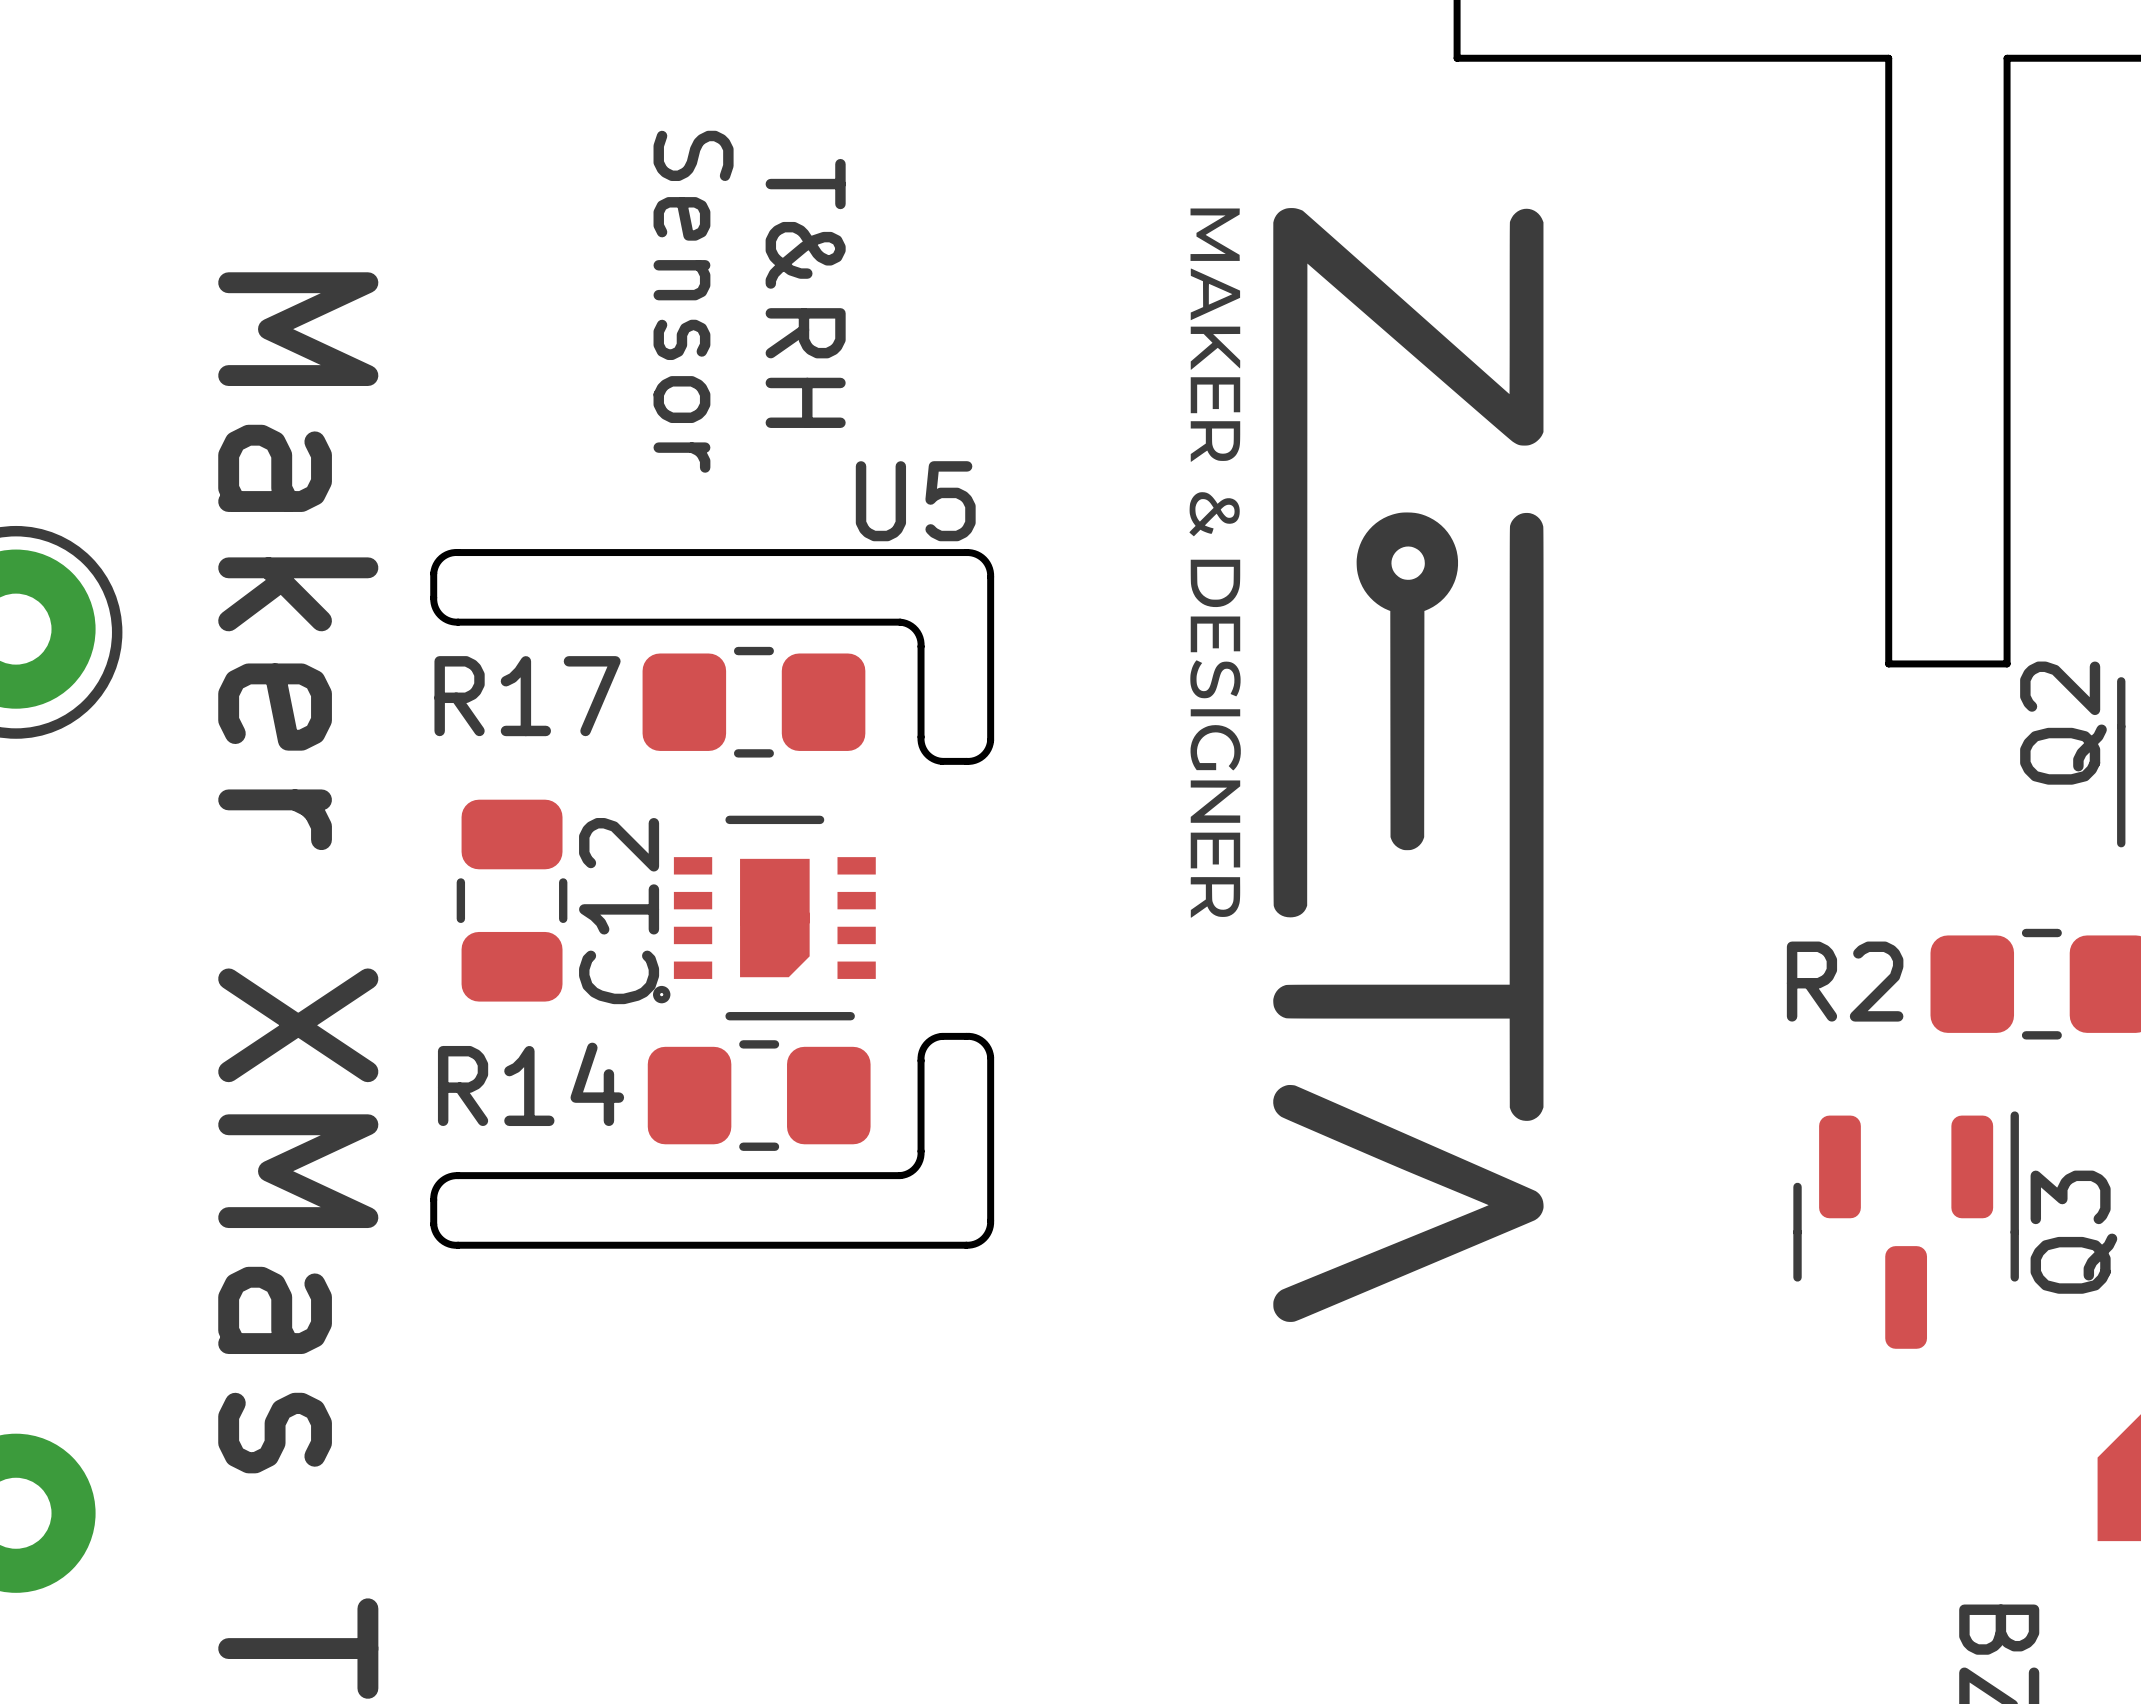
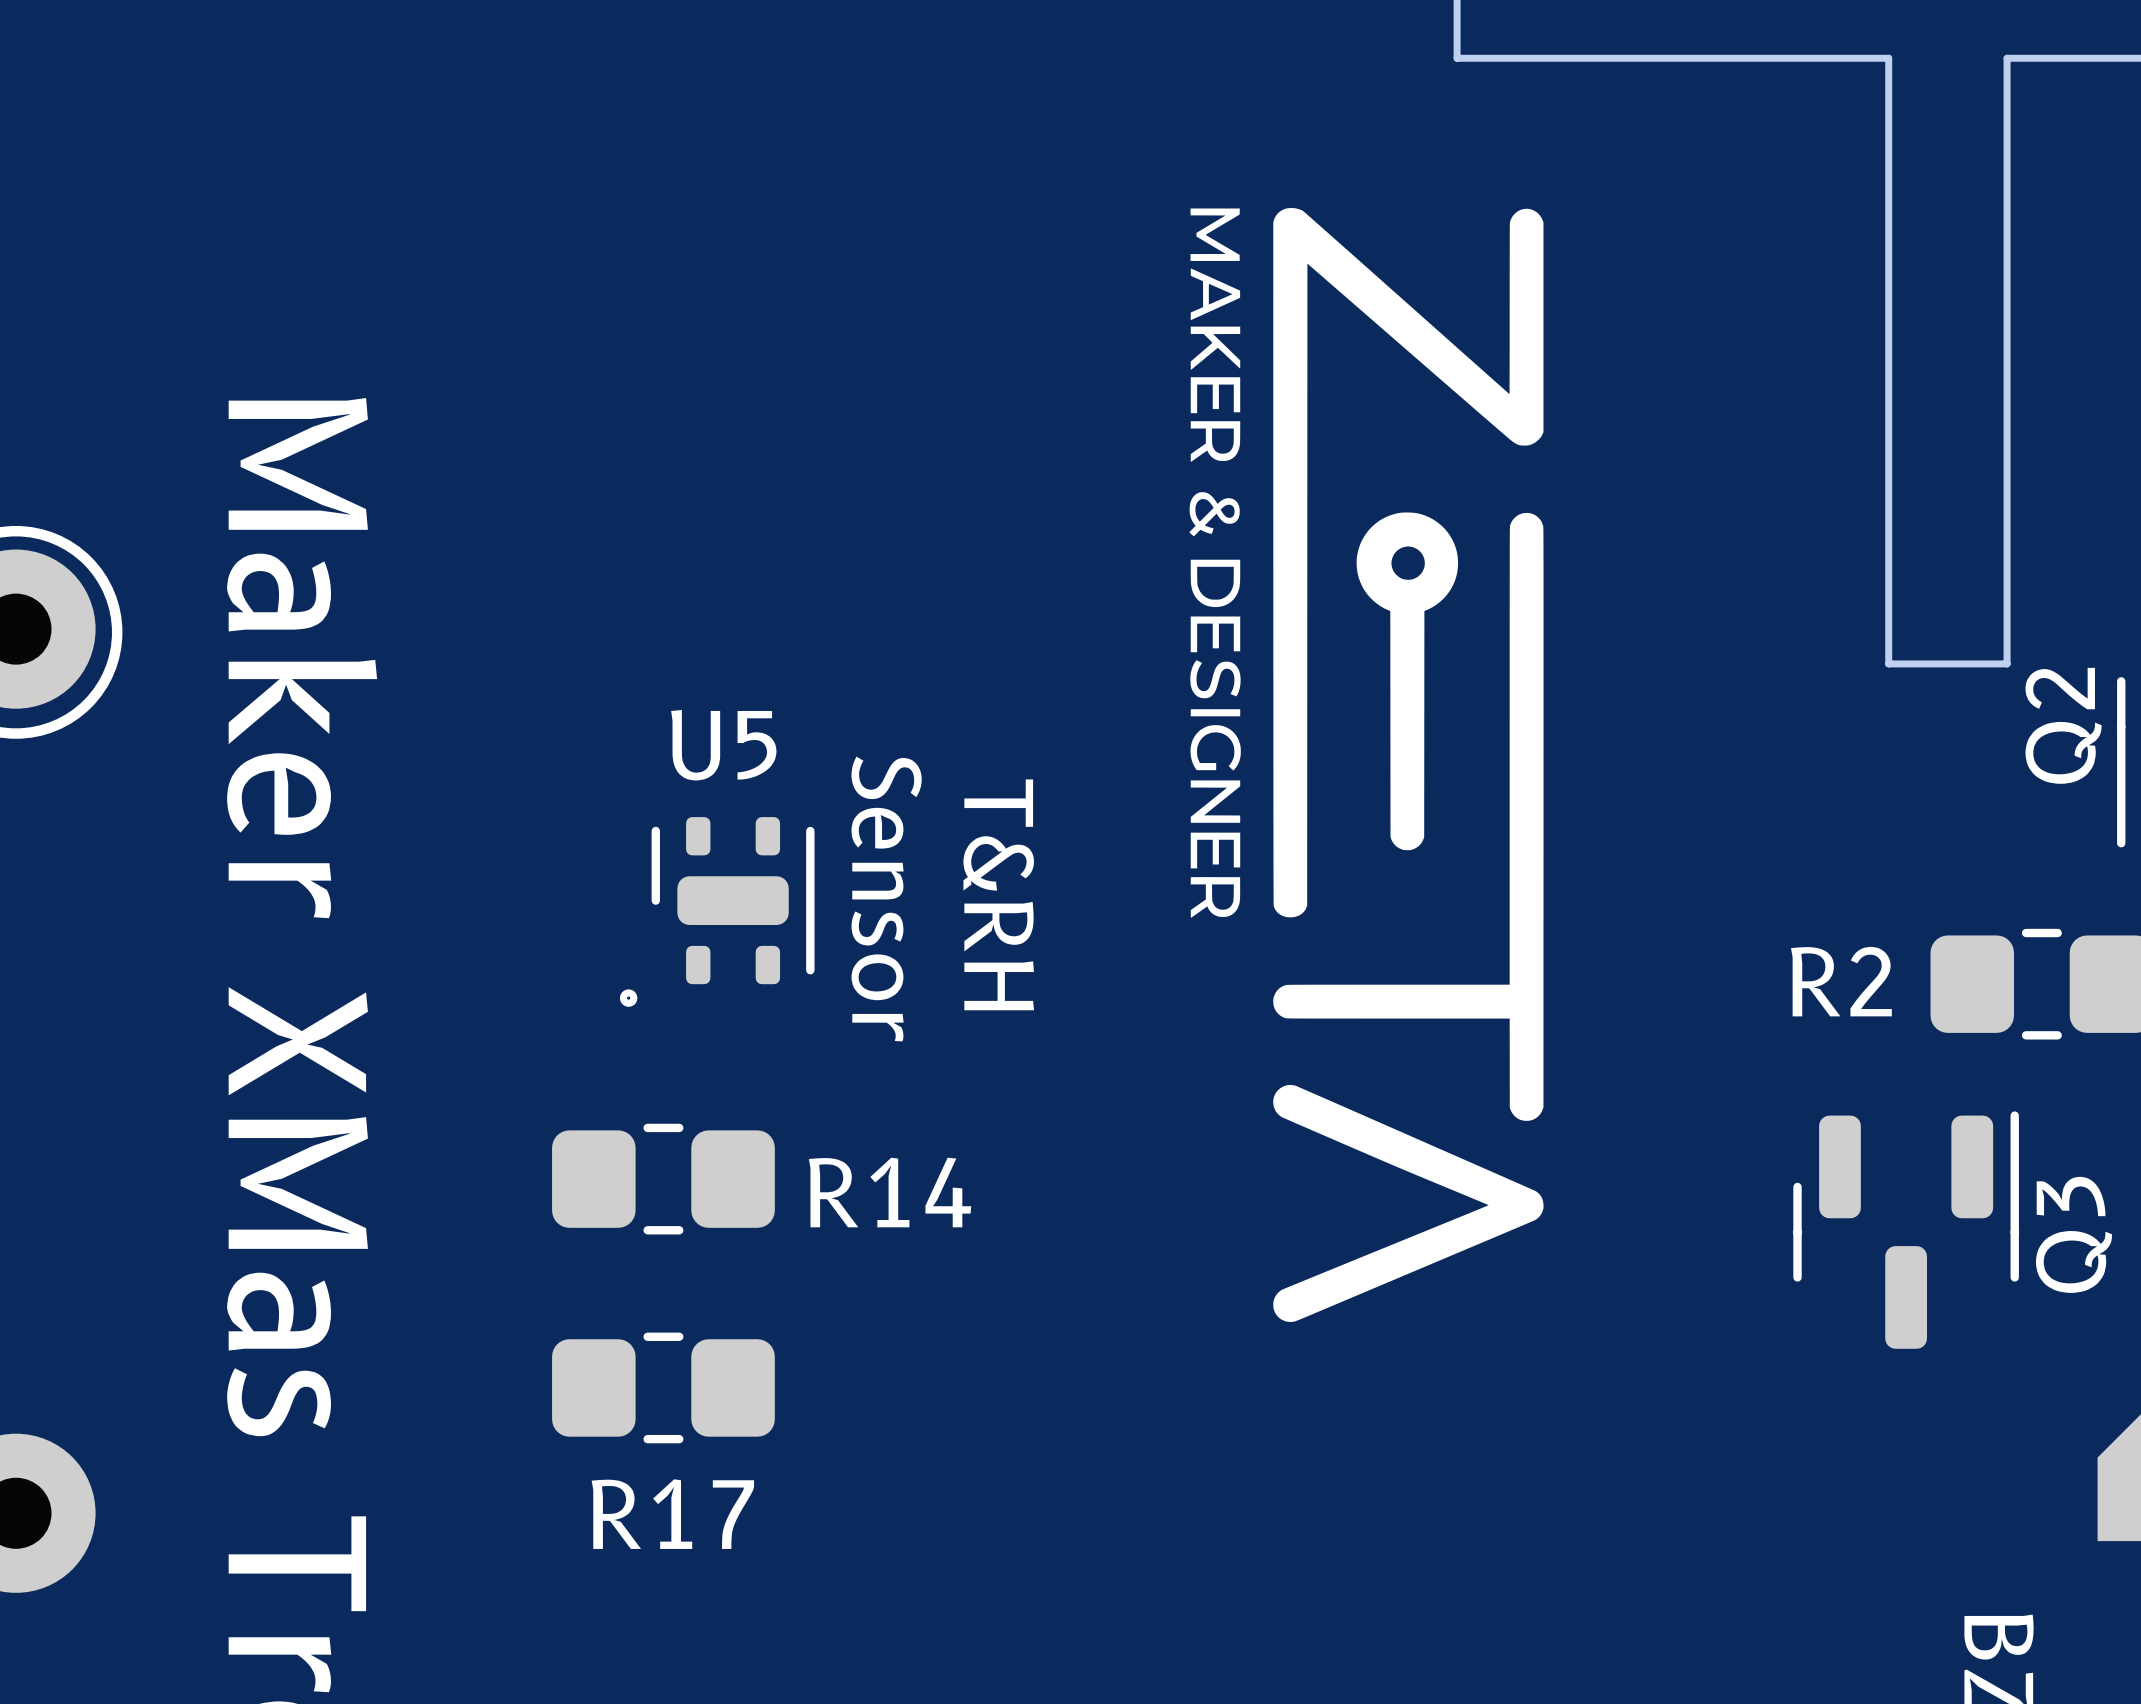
text position: T&RH (805, 293) -> T&RH (998, 894)
text position: Sensor (693, 301) -> Sensor (886, 899)
U5 name position: U5 (915, 501) -> U5 (723, 745)
board edge: (458, 552) (974, 553) (985, 561) (990, 574) (989, 746) (982, 756) (969, 761) (938, 760) (930, 757) (924, 751) (921, 739) (920, 640) (915, 630) (905, 623) (452, 621) (442, 617) (435, 608) (433, 600) (433, 573) (436, 564) (441, 557) (449, 553) (458, 552) -> none
R17 name position: R17 (527, 696) -> R17 (672, 1514)
R17 position: (753, 702) -> (663, 1387)
U5 footprint: [673, 815, 876, 1021] -> [651, 817, 815, 985]
C12: (512, 900) -> none
drawing position: (661, 994) -> (628, 998)
board edge: (941, 1036) (975, 1037) (984, 1043) (990, 1054) (990, 1223) (985, 1236) (974, 1244) (455, 1245) (443, 1241) (434, 1230) (434, 1191) (442, 1180) (455, 1175) (905, 1174) (915, 1167) (920, 1157) (922, 1051) (930, 1040) (941, 1036) -> none
R14 name position: R14 (531, 1084) -> R14 (890, 1192)
R14 position: (759, 1095) -> (663, 1179)

